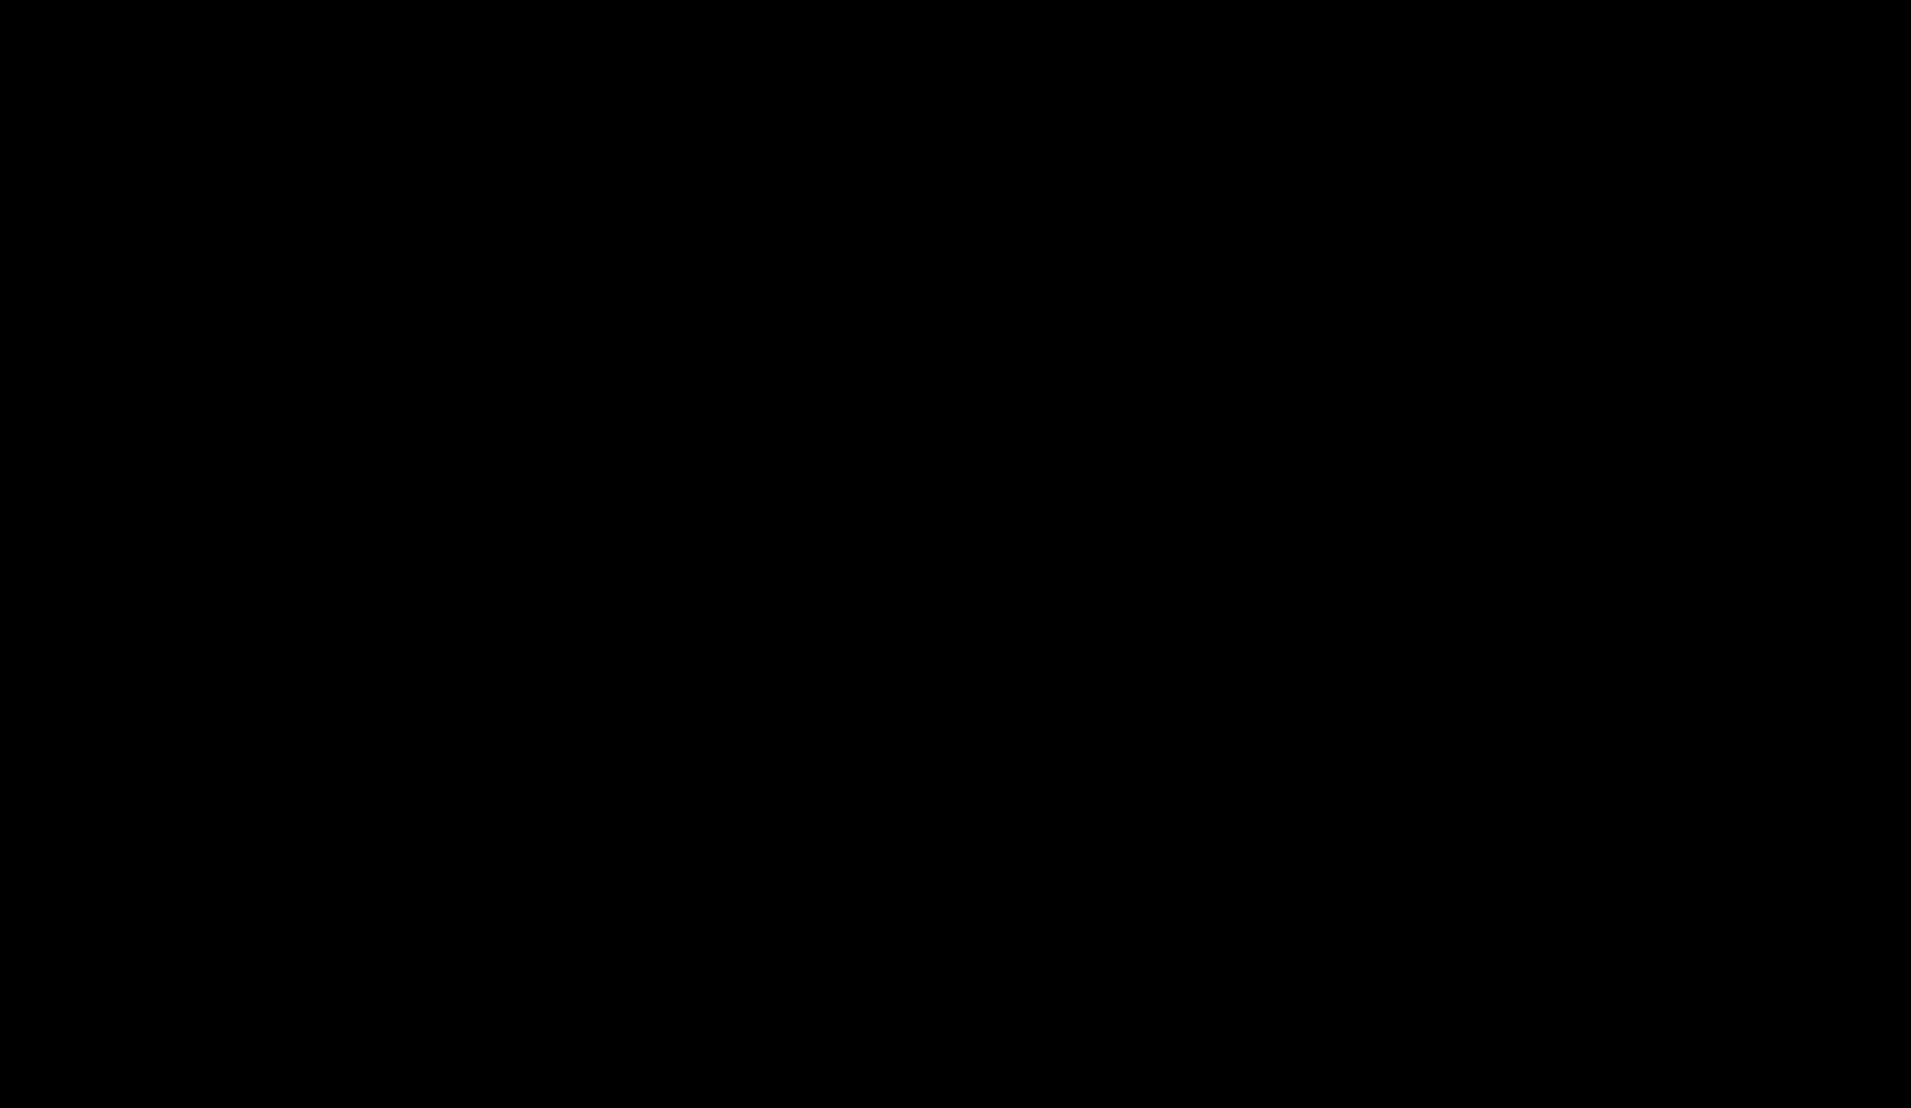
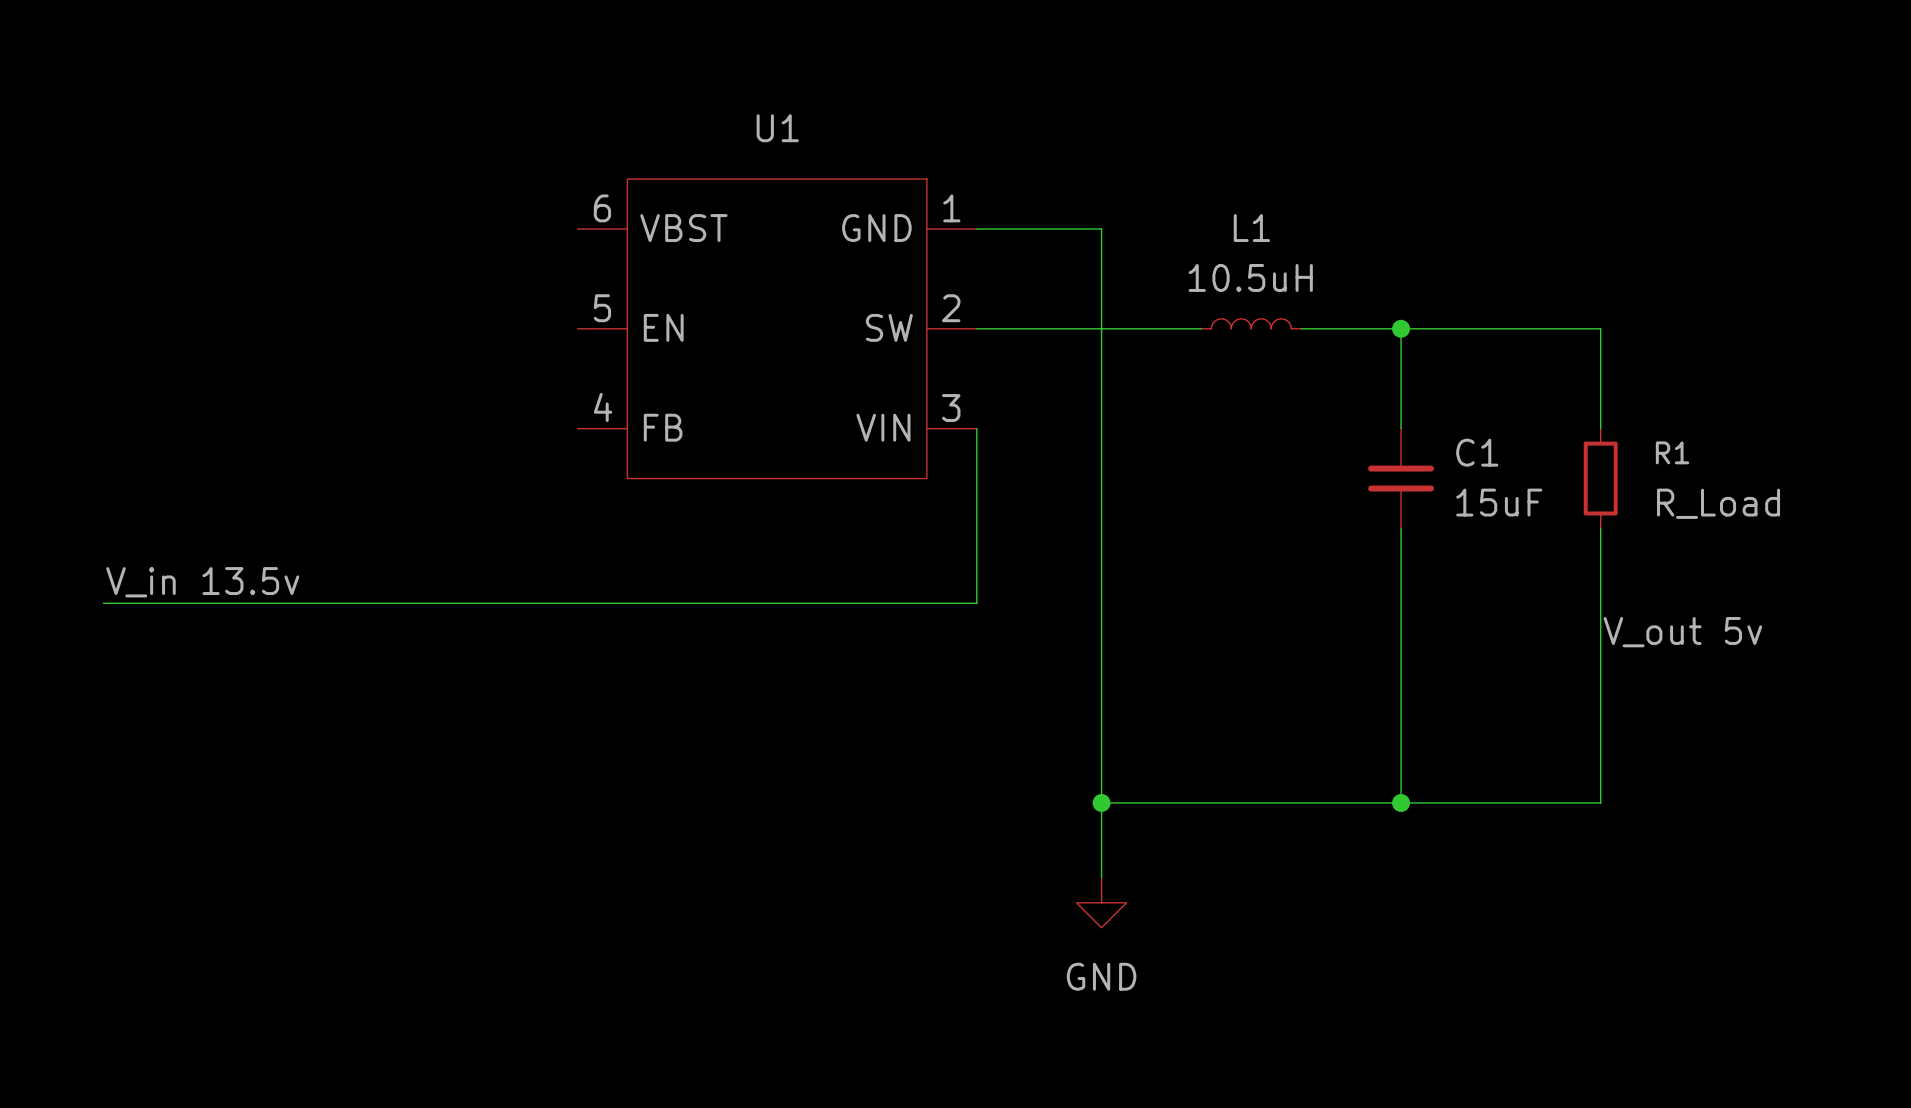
wire: none -> (976, 228) (1101, 228) (1101, 877)
L1: none -> 10.5uH (1251, 323)
U1: none -> (777, 328)
wire: none -> (976, 328) (1201, 328)
wire: none -> (1301, 328) (1600, 328) (1600, 428)
wire: none -> (1401, 328) (1401, 428)
junction: none -> (1401, 328)
wire: none -> (976, 428) (976, 603) (103, 603)
C1: none -> 15uF (1401, 478)
R1: none -> R_Load (1600, 478)
wire: none -> (1401, 528) (1401, 802)
wire: none -> (1600, 528) (1600, 802) (1101, 802)
label: none -> V_in 13.5v (202, 582)
label: none -> V_out 5v (1682, 632)
junction: none -> (1101, 802)
junction: none -> (1401, 802)
power symbol: none -> GND (1101, 902)

